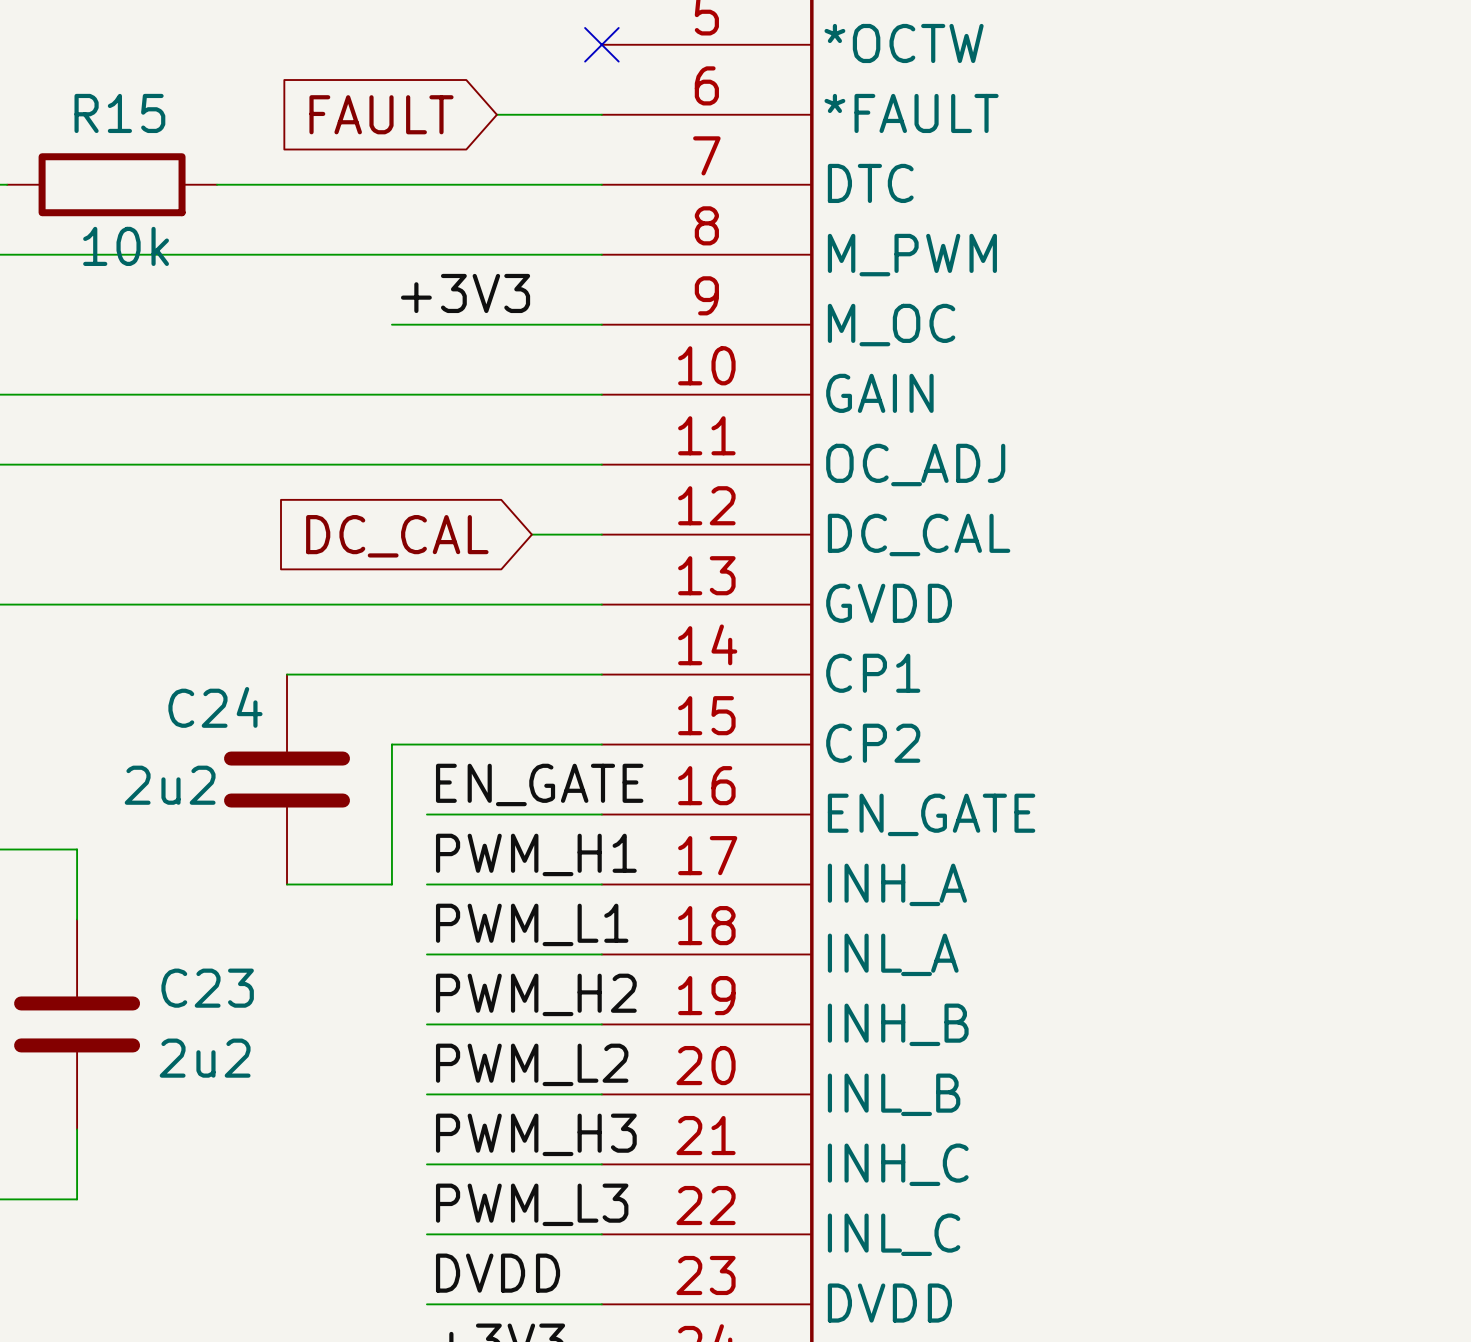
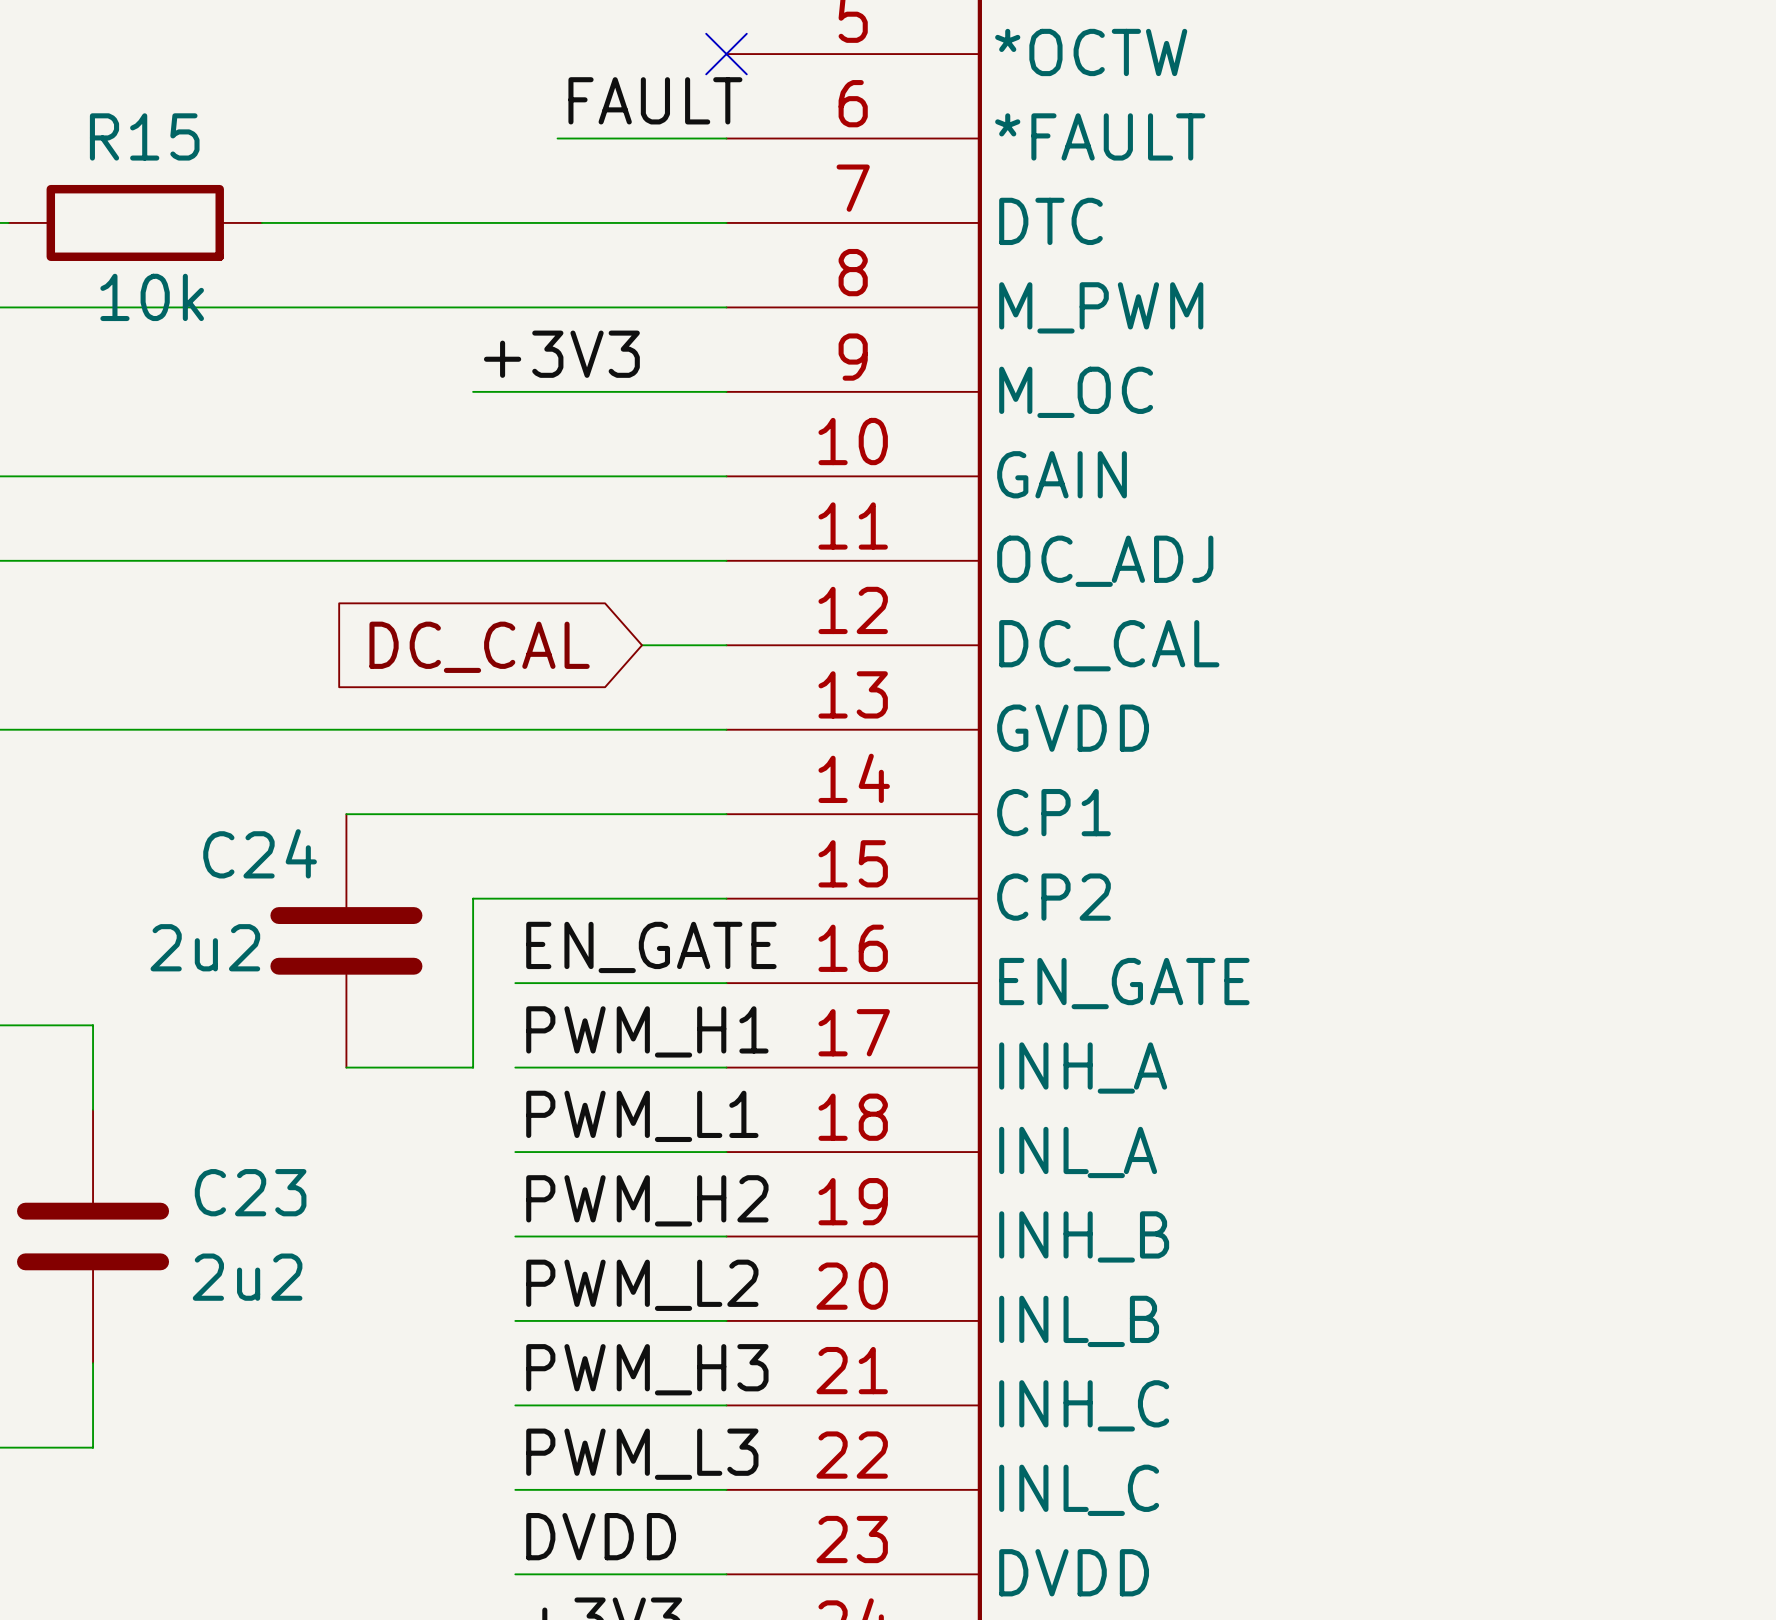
label: none -> FAULT (655, 100)
global label: FAULT (381, 114) -> none
wire: none -> (557, 138) (599, 138)

